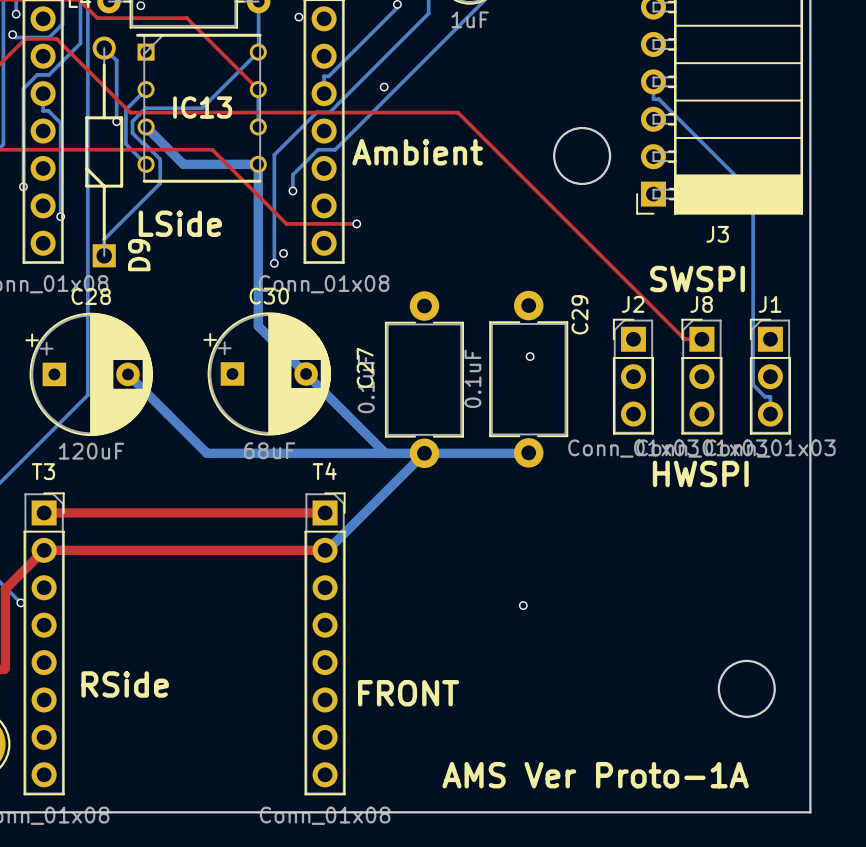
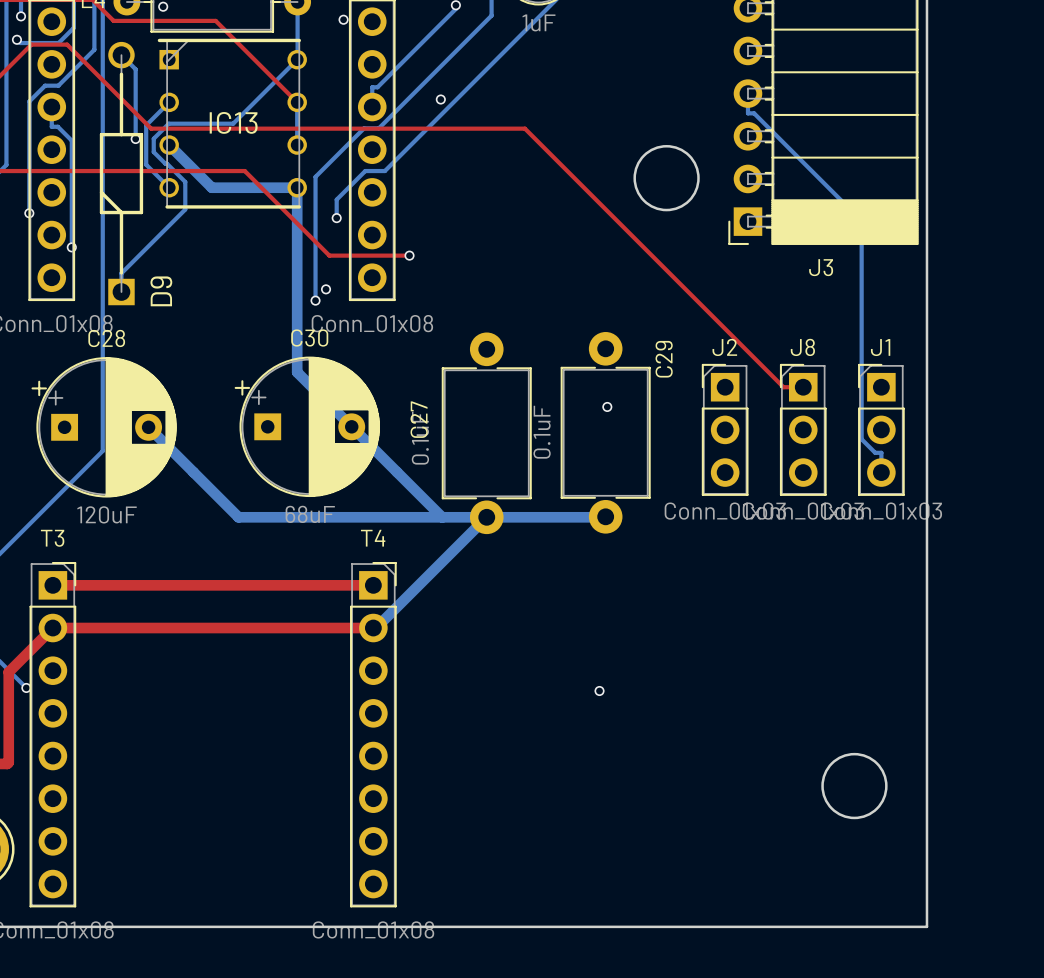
text: Ambient (417, 152) -> none
text: LSide (180, 223) -> none
text: SWSPI (697, 279) -> none
text: HWSPI (700, 473) -> none
text: RSide (125, 684) -> none
text: FRONT (408, 693) -> none
text: AMS Ver Proto-1A (595, 775) -> none

